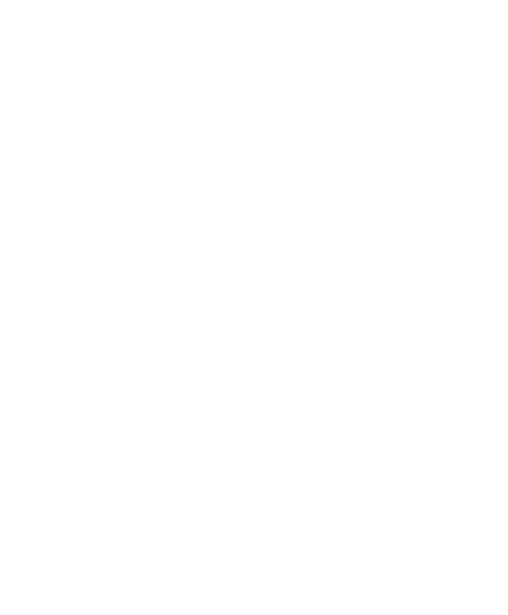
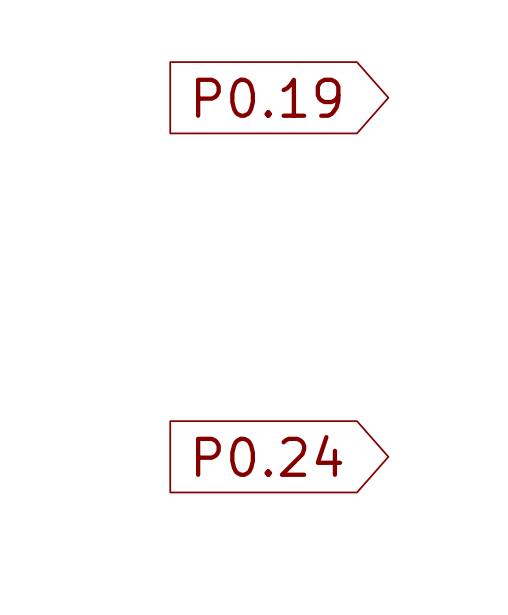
global label: none -> P0.19 (268, 97)
global label: none -> P0.24 (269, 455)

